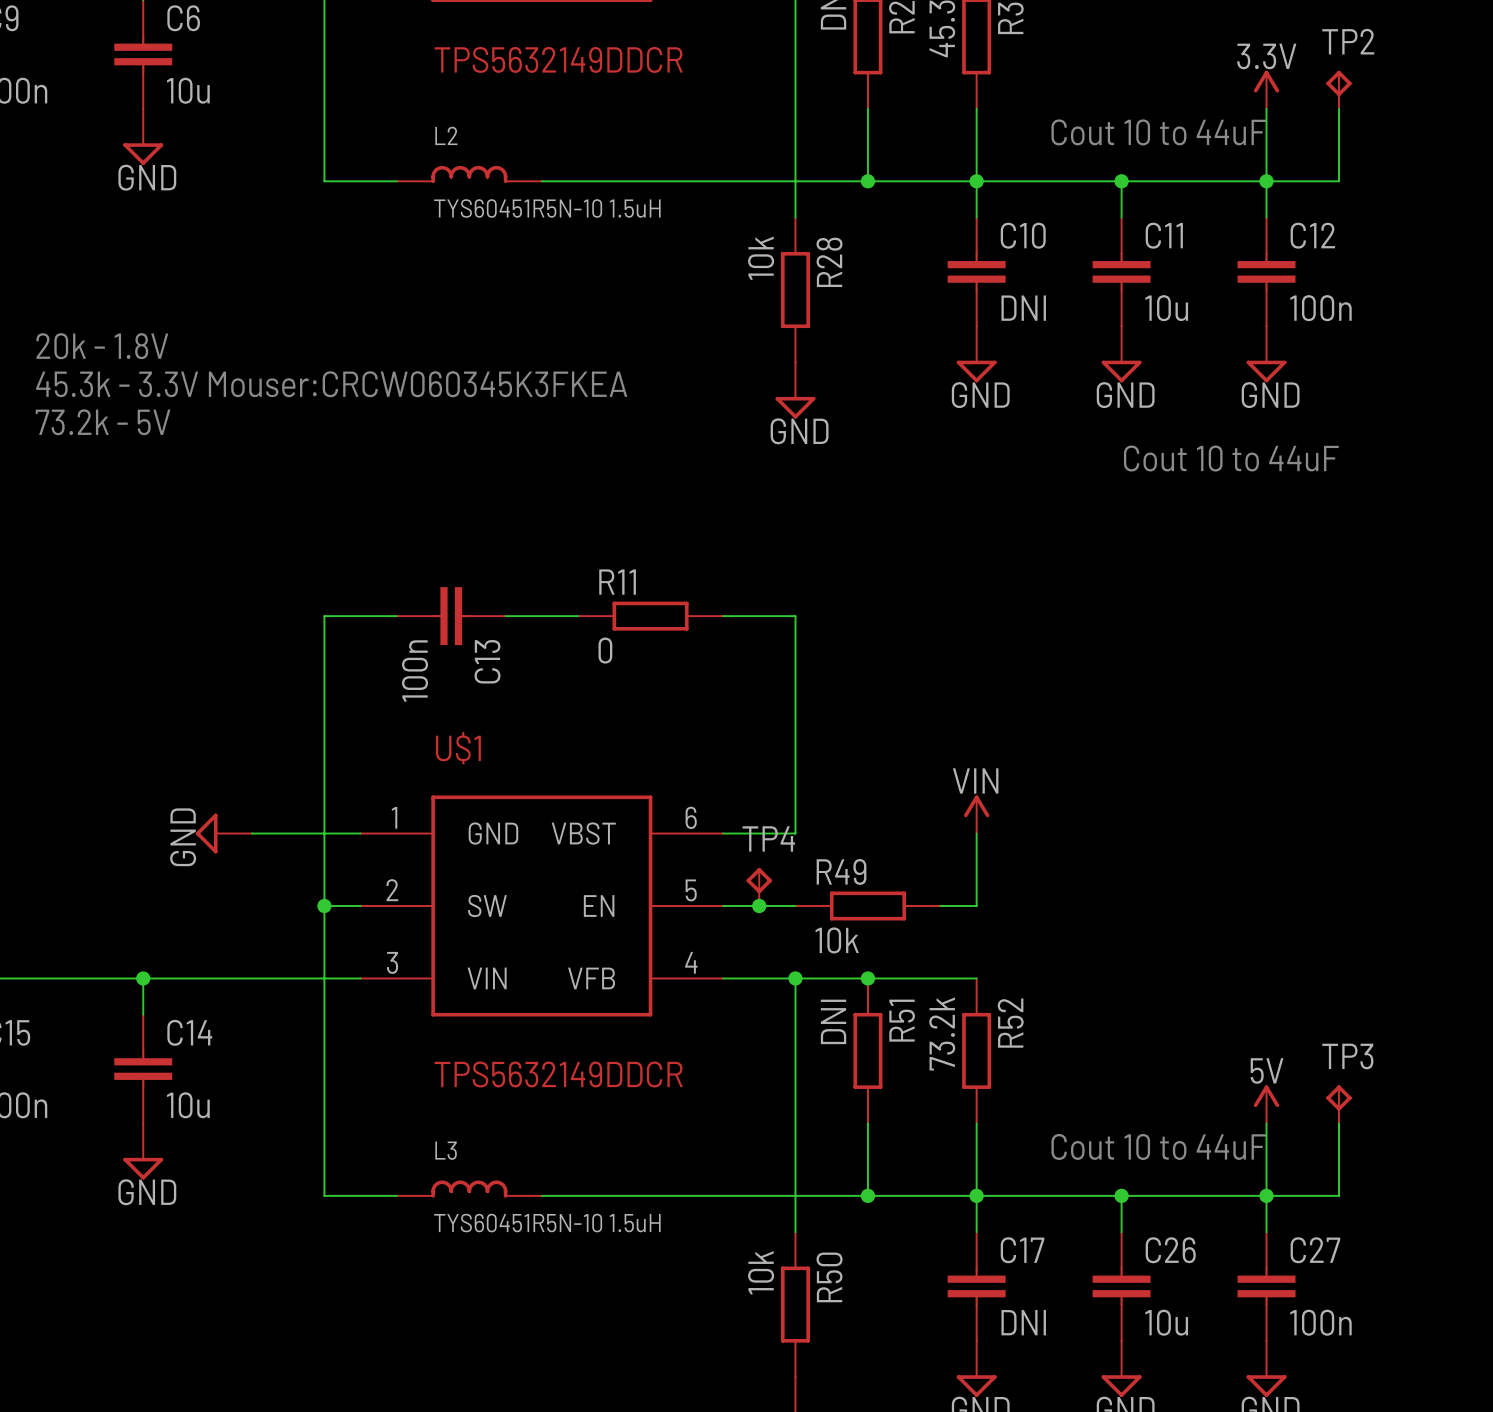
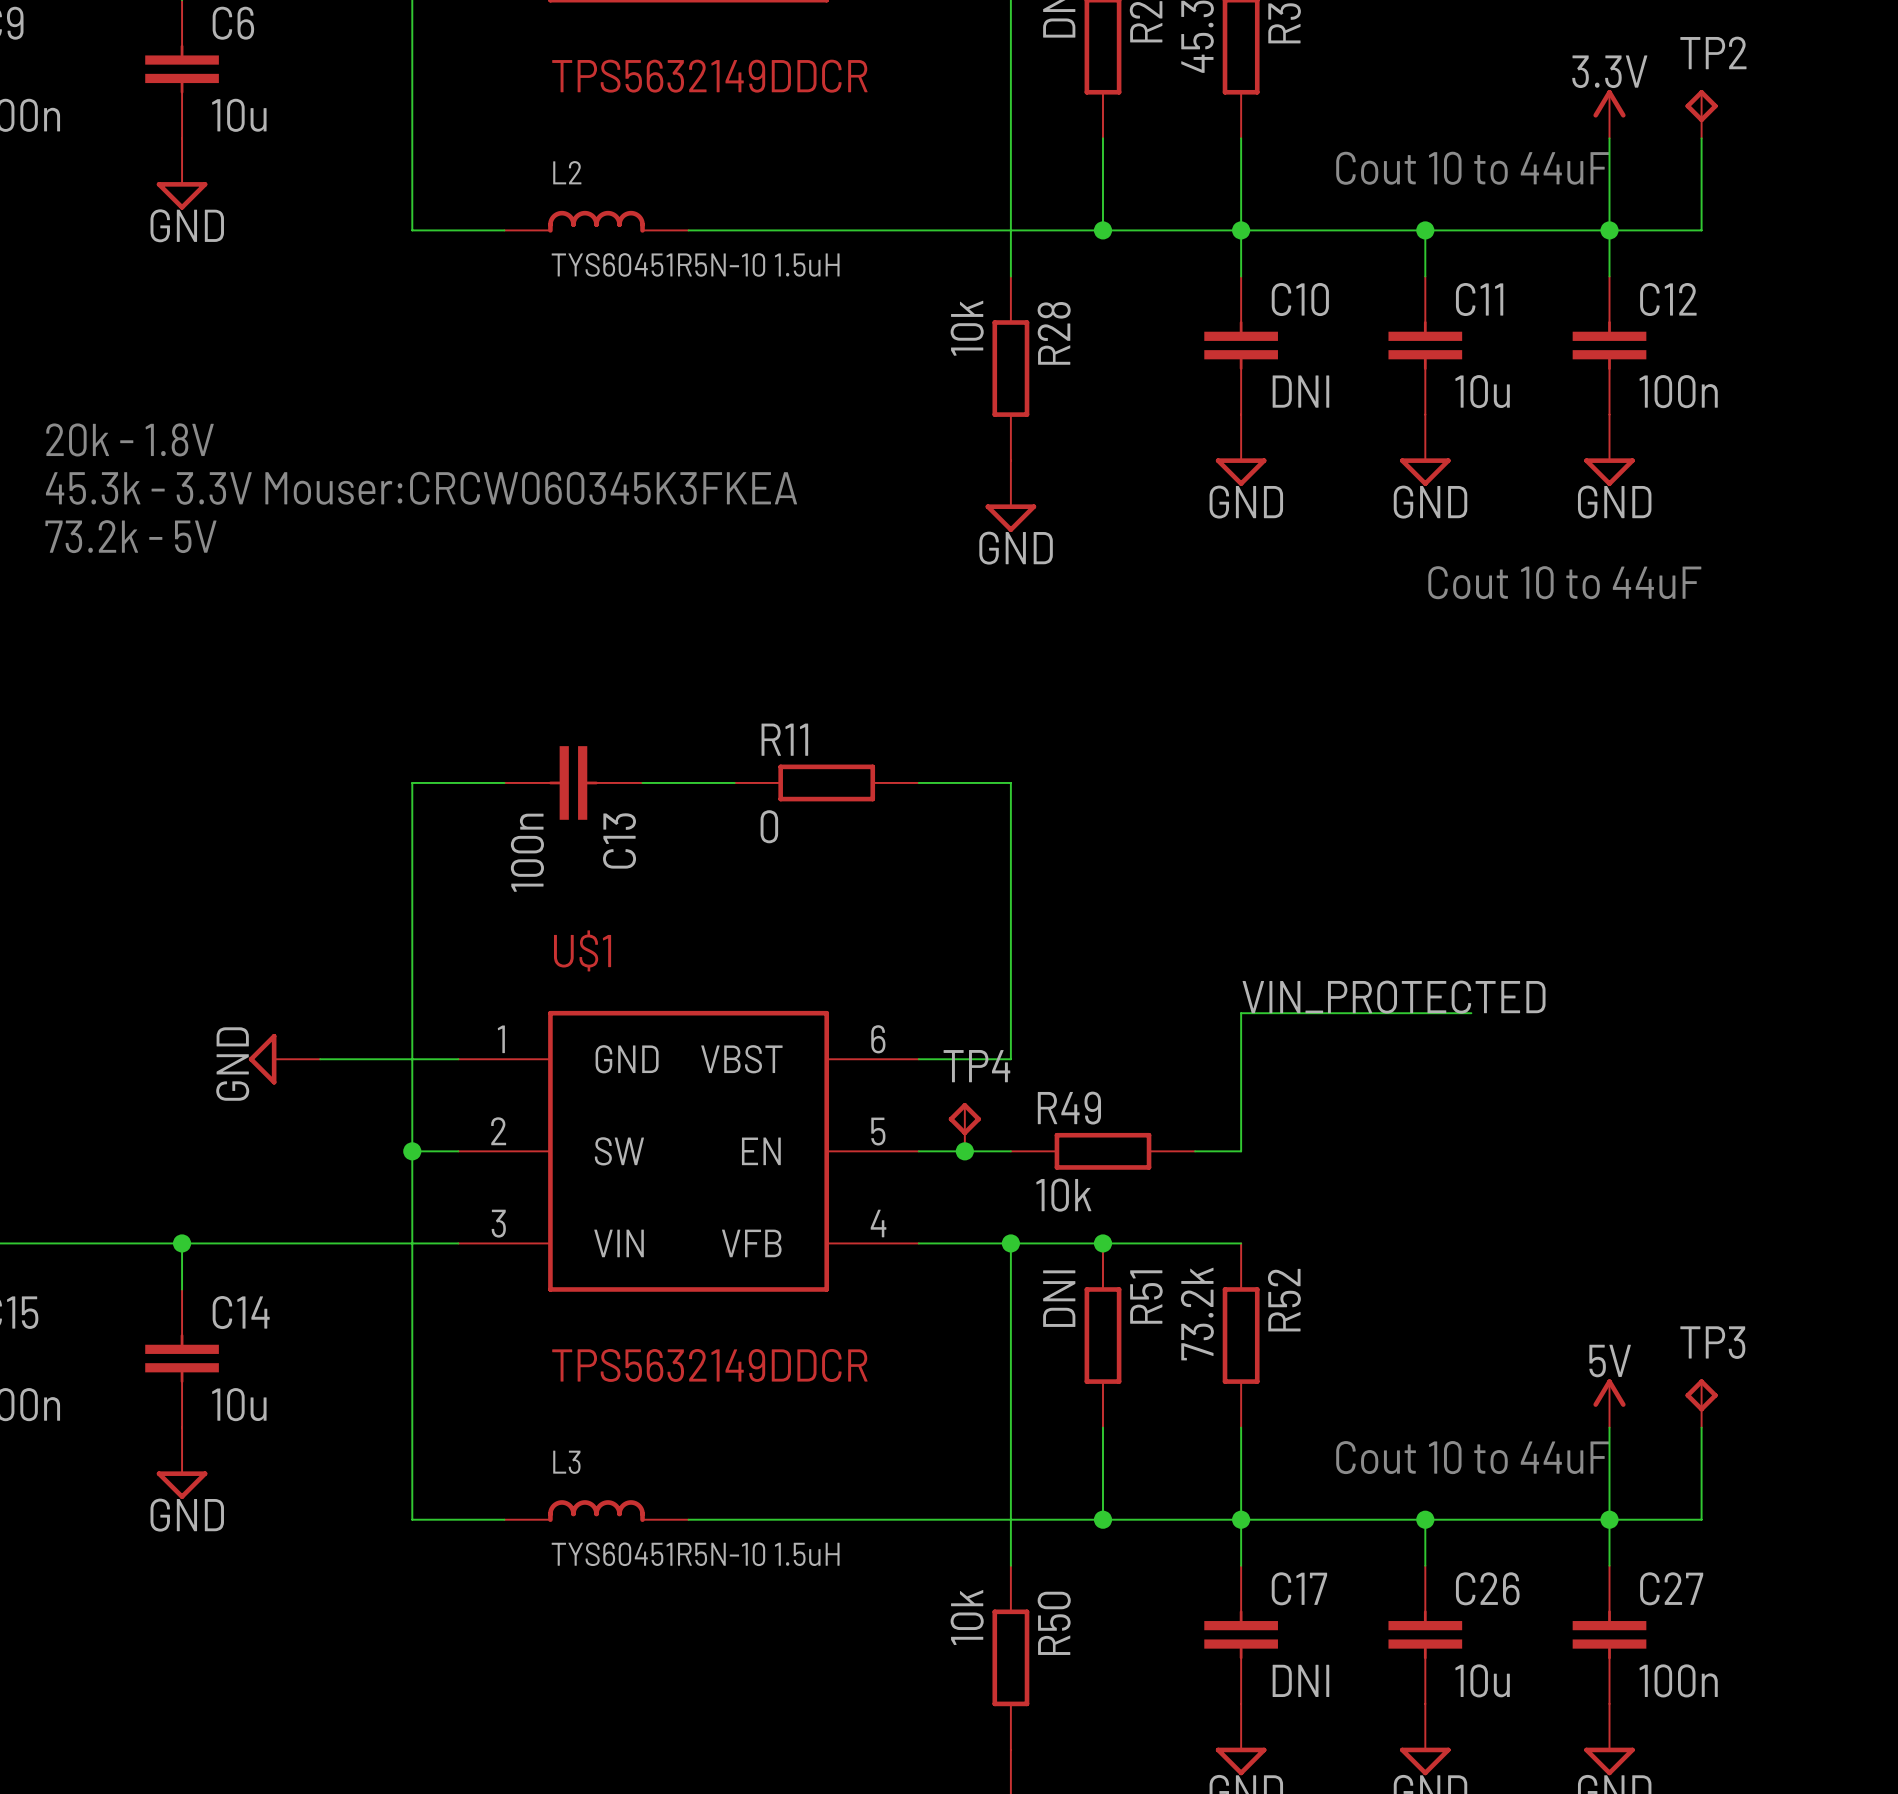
label: none -> VIN_PROTECTED (1394, 997)
wire: none -> (1471, 1013) (1241, 1013) (1241, 1059)
power symbol: VIN (976, 814) -> none

